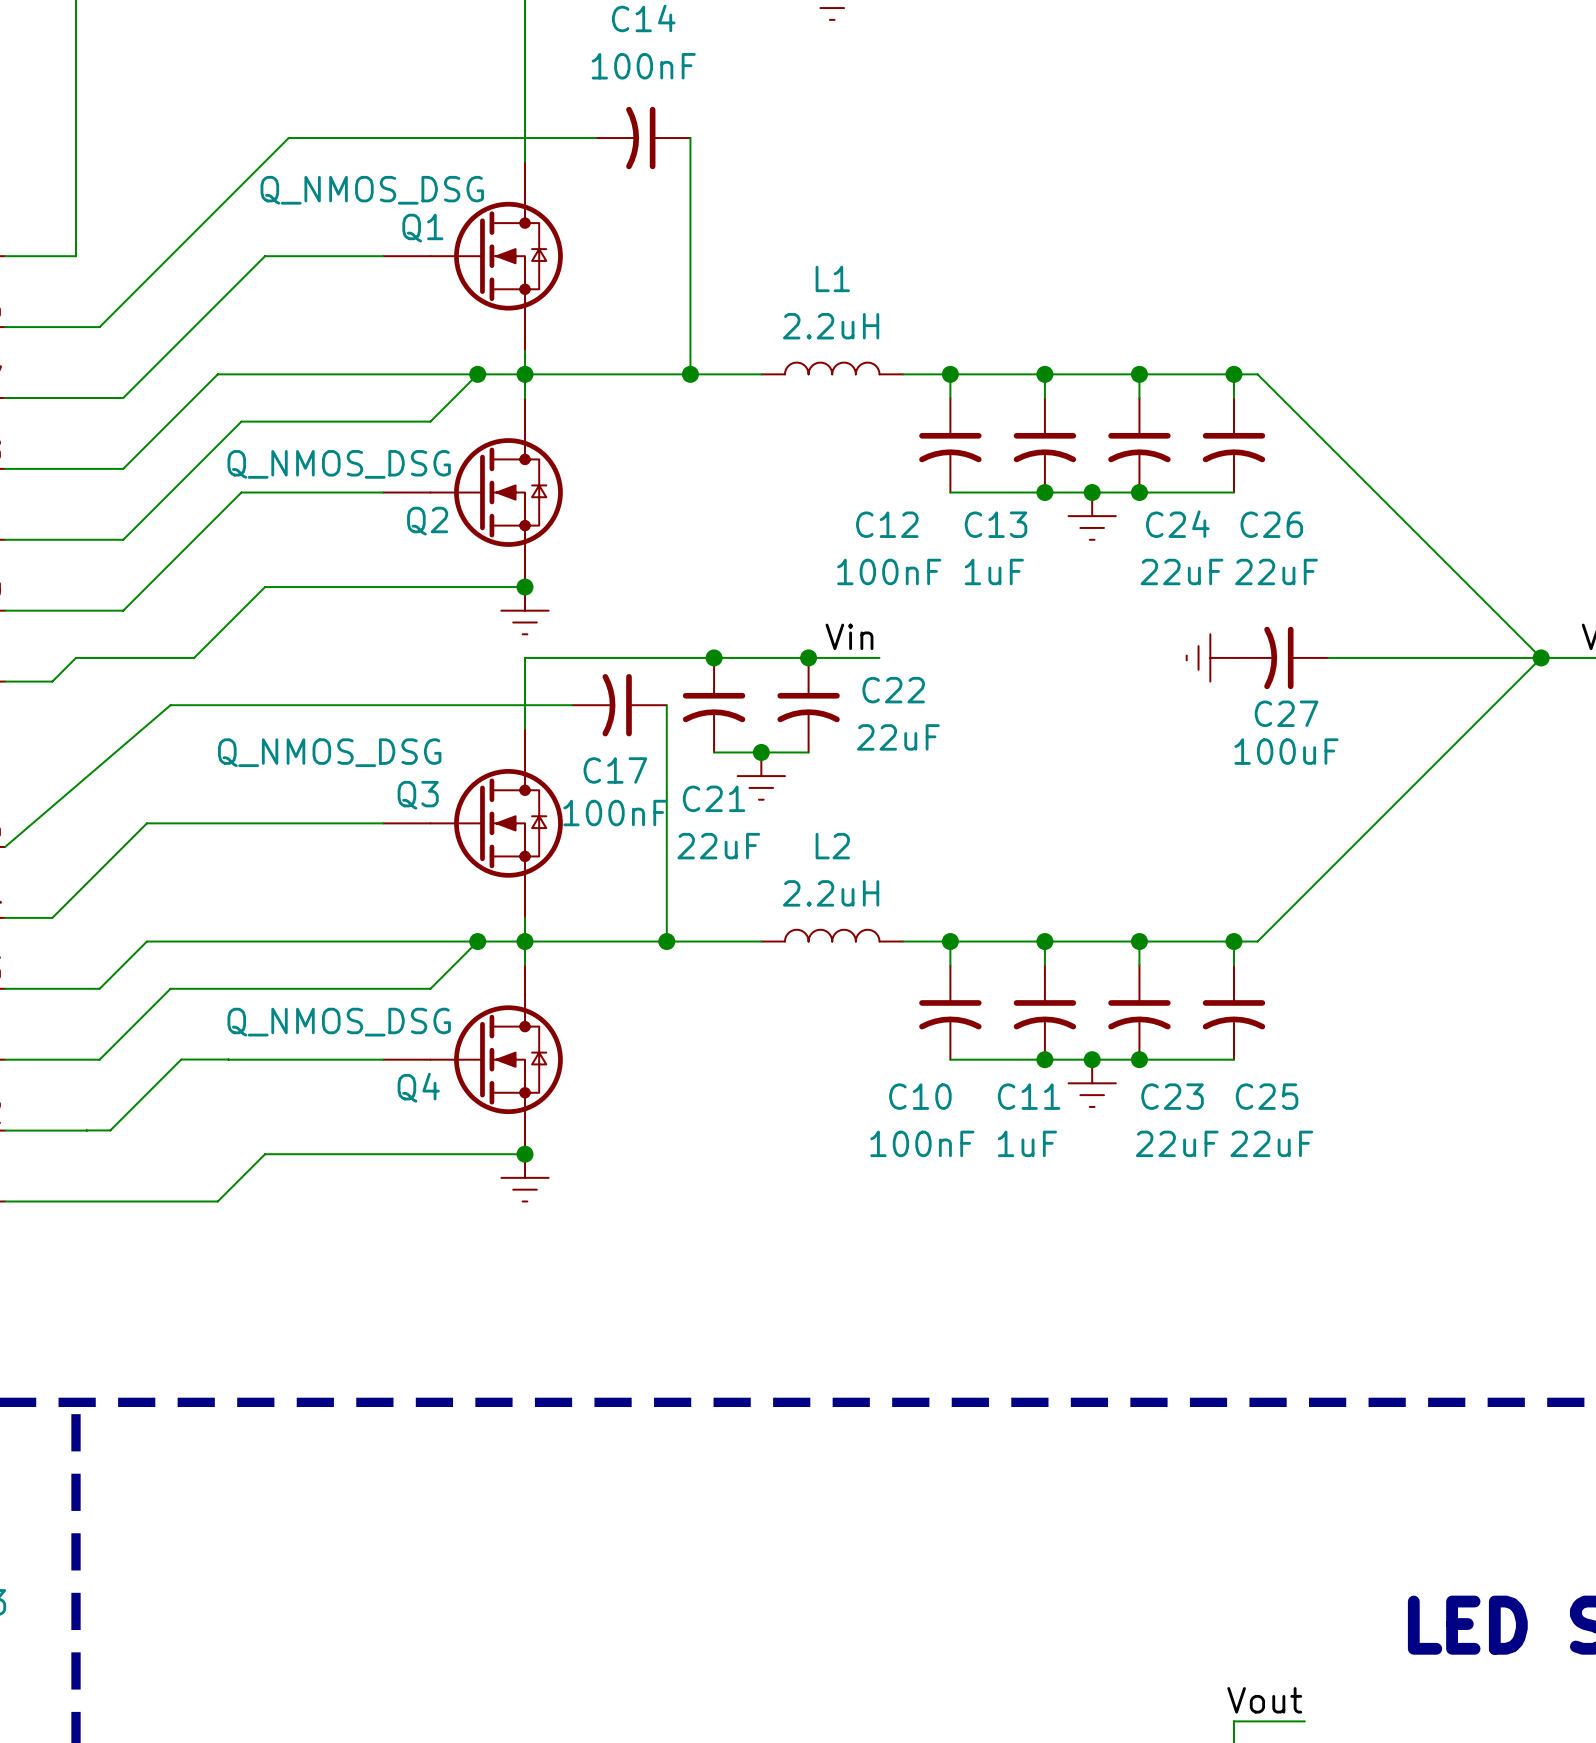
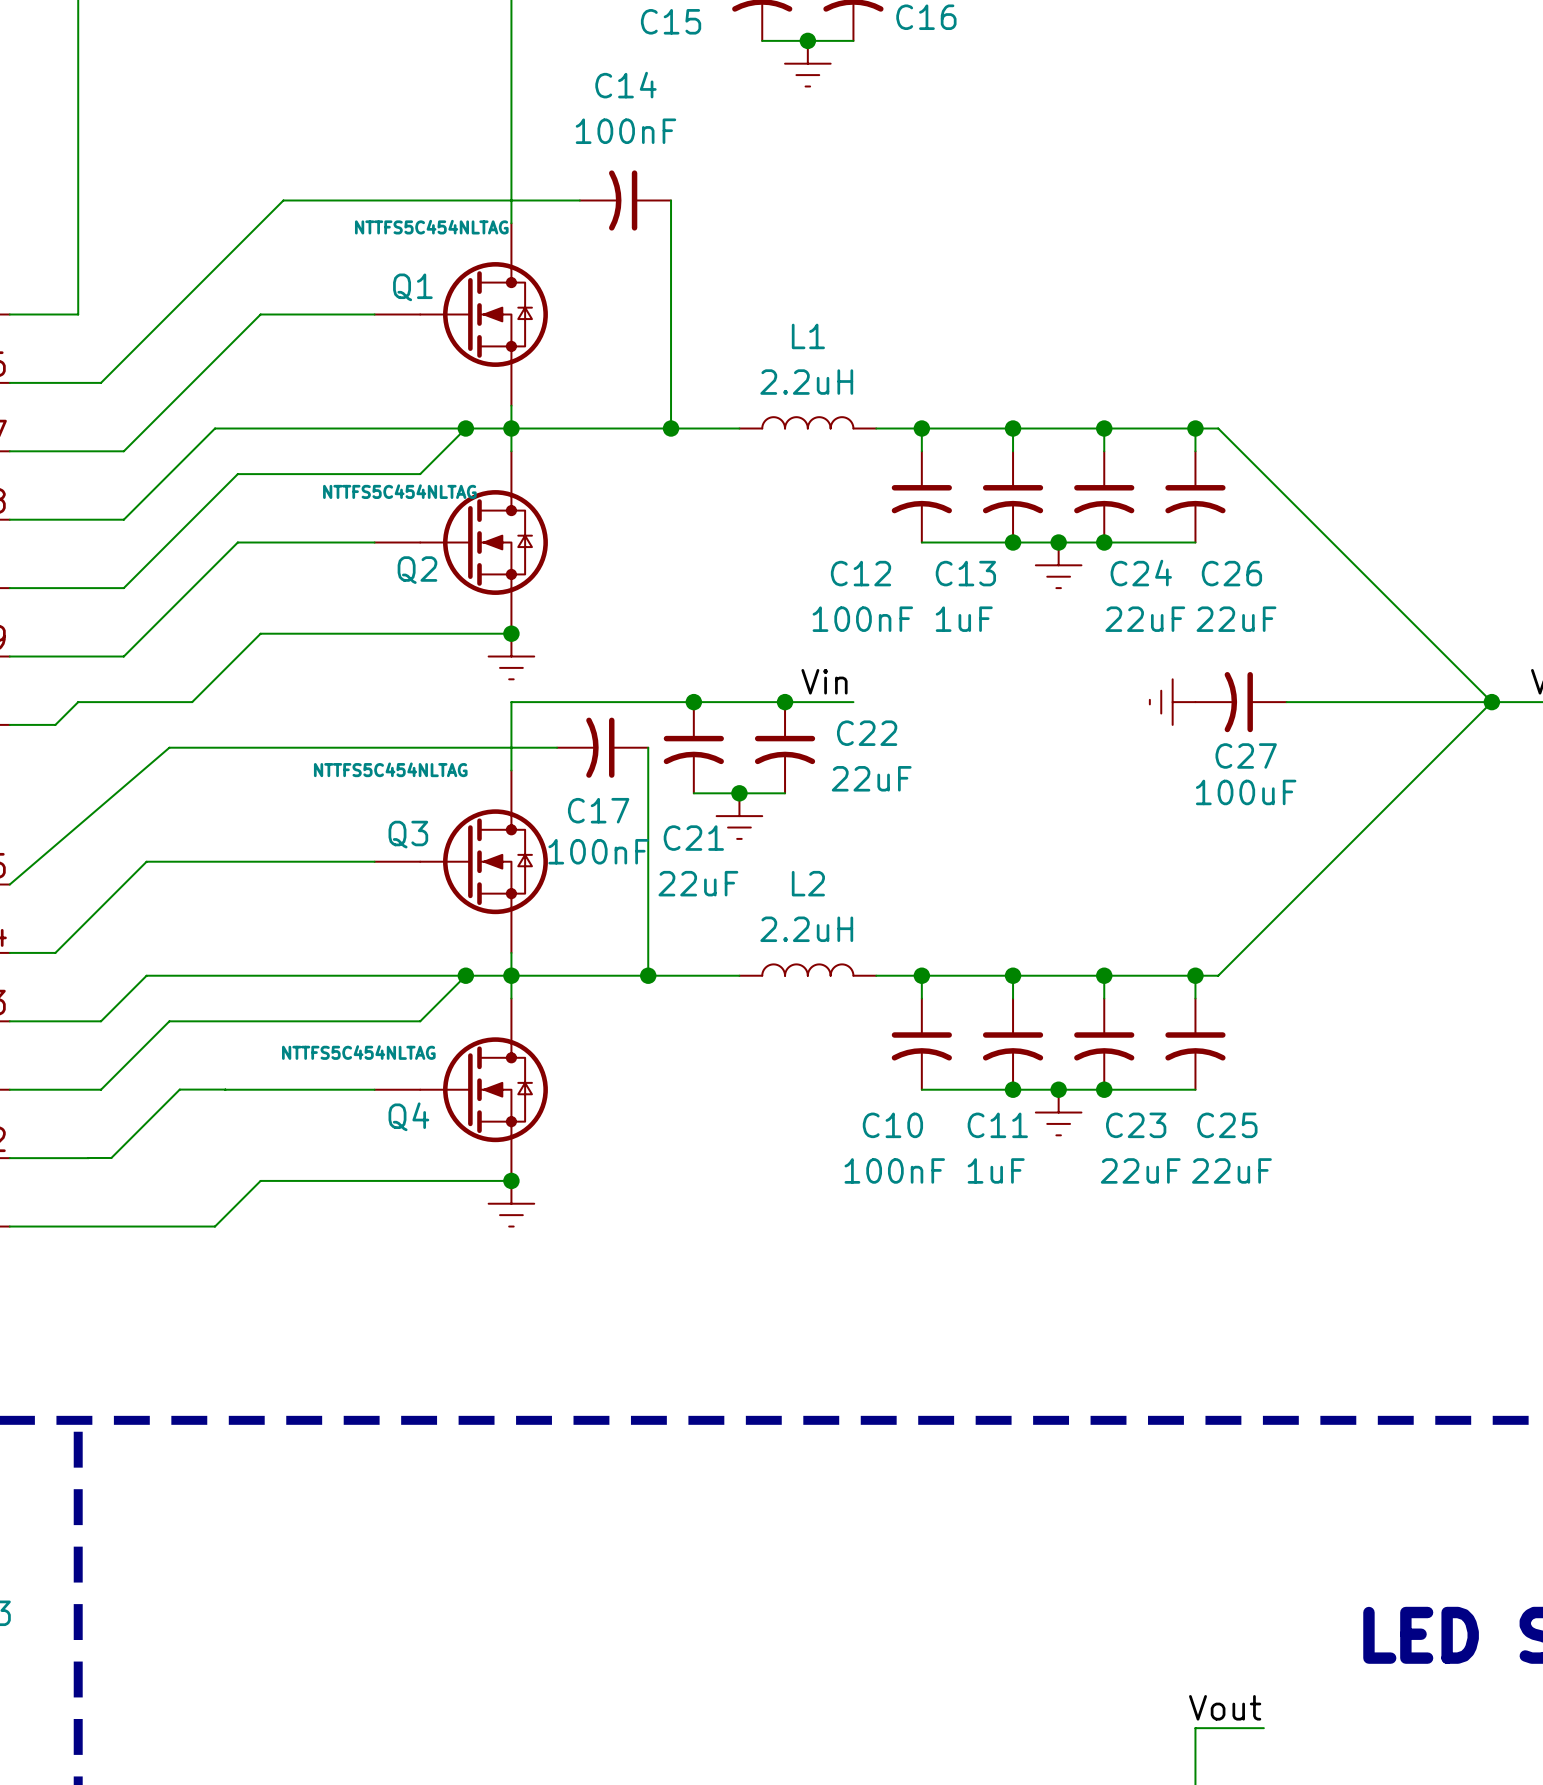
Q1 value: Q_NMOS_DSG (372, 190) -> NTTFS5C454NLTAG (431, 227)
Q2 value: Q_NMOS_DSG (339, 464) -> NTTFS5C454NLTAG (399, 491)
Q3 value: Q_NMOS_DSG (329, 752) -> NTTFS5C454NLTAG (390, 769)
Q4 value: Q_NMOS_DSG (339, 1022) -> NTTFS5C454NLTAG (358, 1052)

